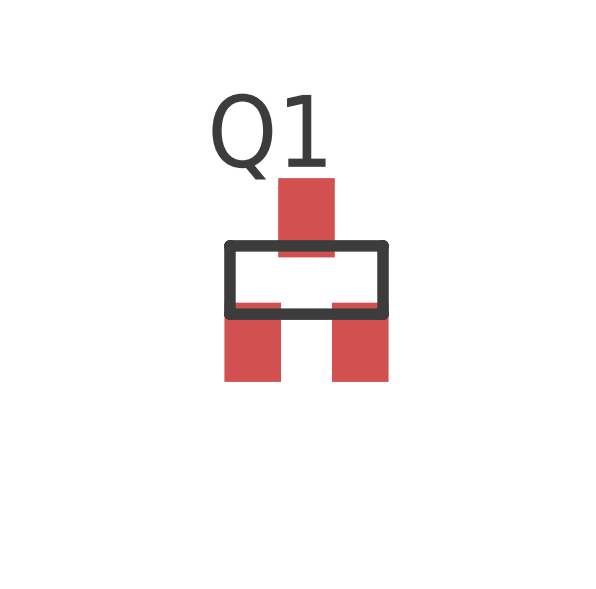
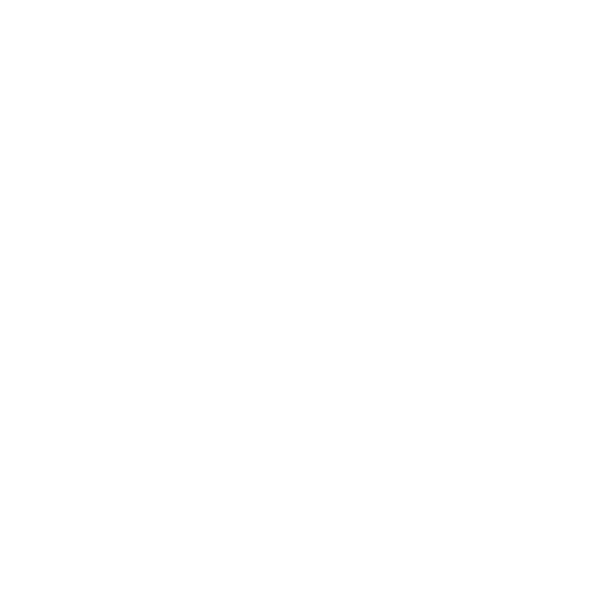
Q1: (306, 280) -> none

